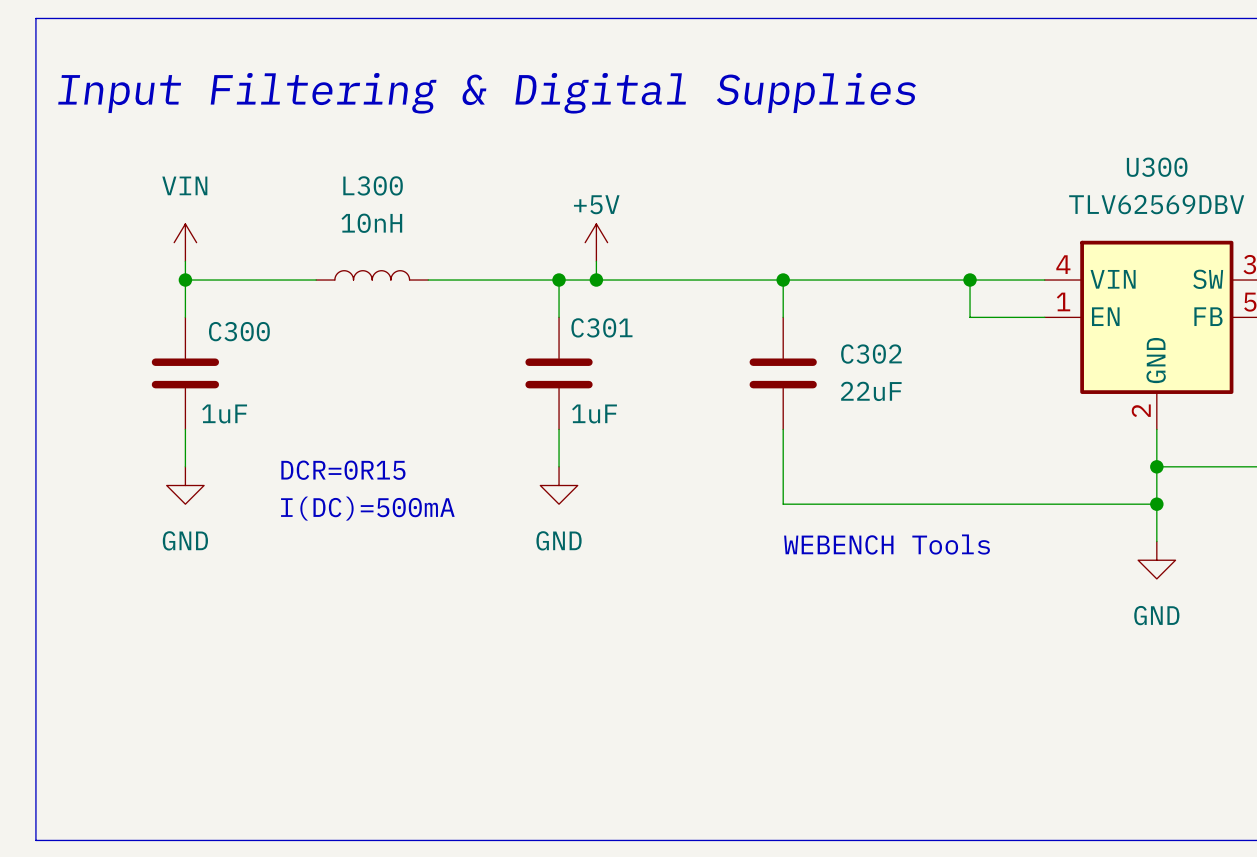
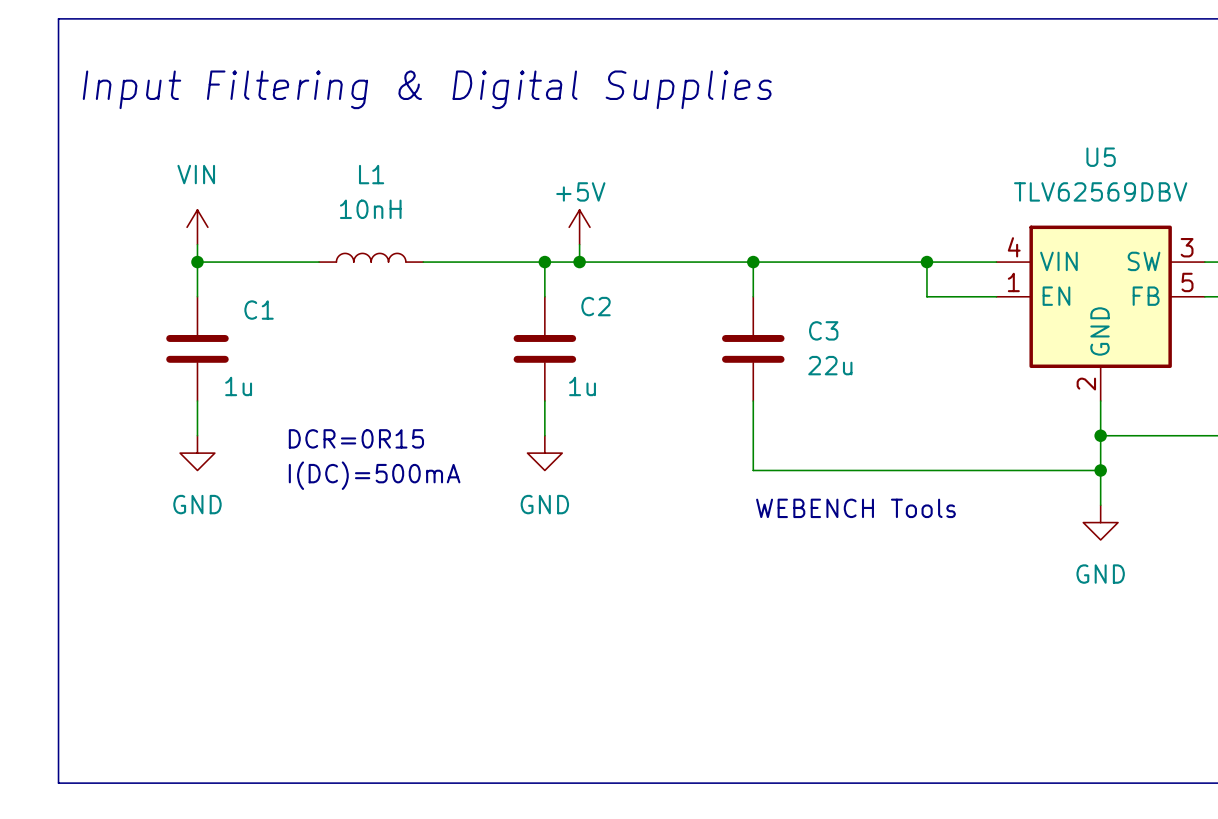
U300 name: U300 (1157, 167) -> U5 (1101, 157)
L300 name: L300 (373, 185) -> L1 (371, 174)
C301 name: C301 (601, 327) -> C2 (596, 306)
C300 name: C300 (239, 331) -> C1 (259, 310)
C302 name: C302 (871, 354) -> C3 (823, 330)
C302 value: 22uF (871, 391) -> 22u (830, 365)
C300 value: 1uF (224, 413) -> 1u (238, 386)
C301 value: 1uF (594, 413) -> 1u (582, 386)

